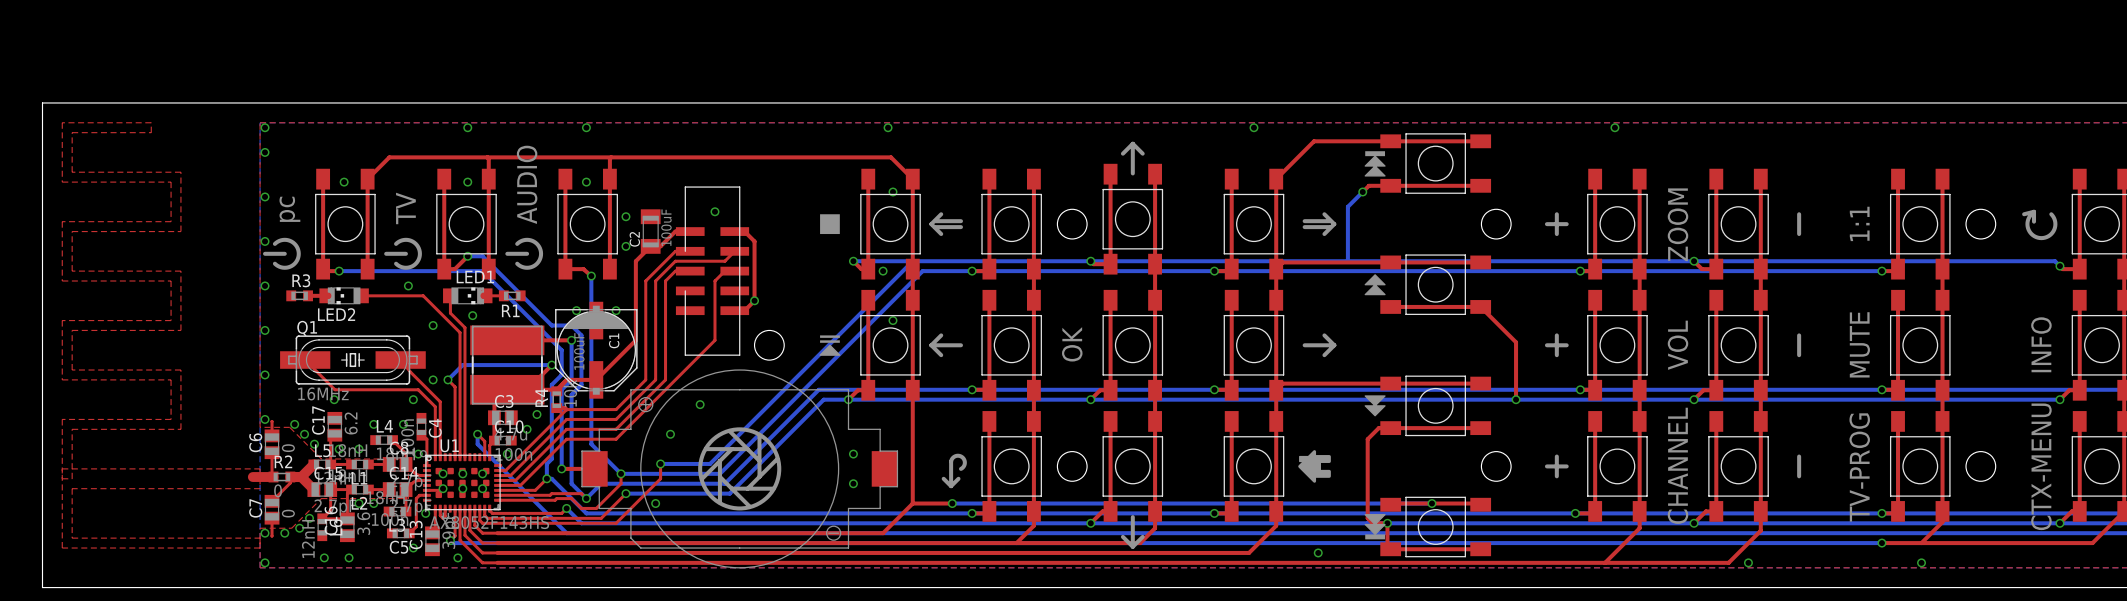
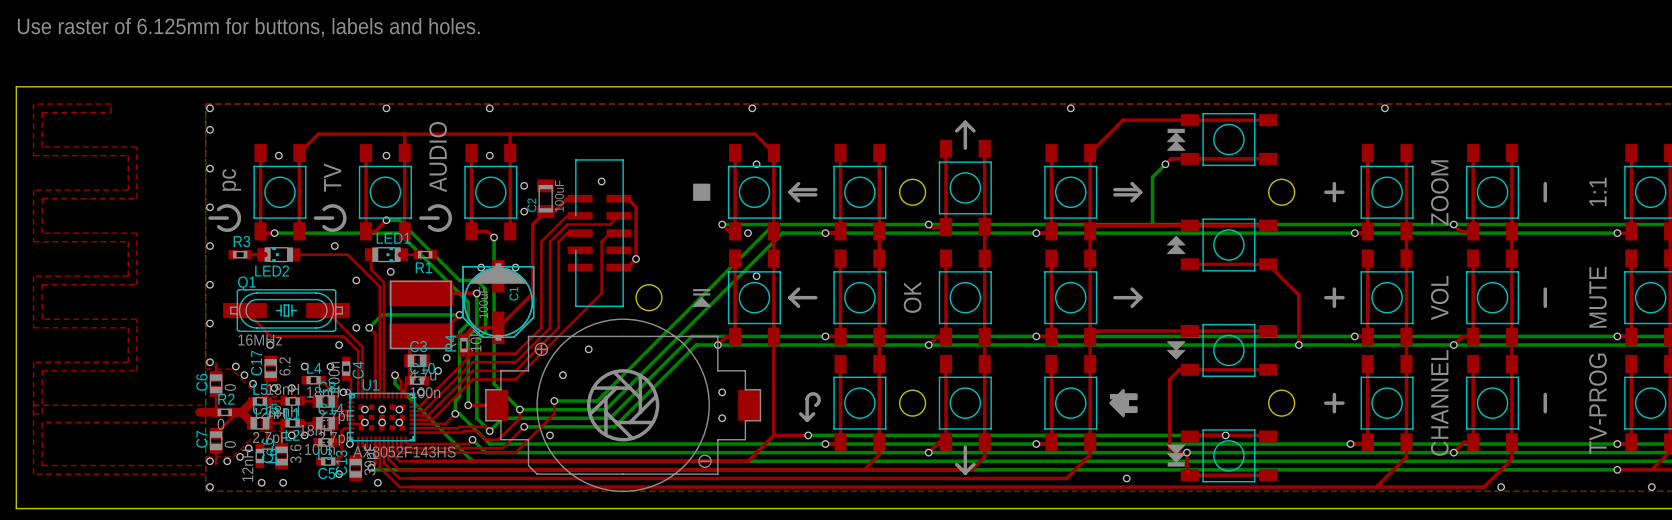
text: none -> Use raster of 6.125mm for buttons, labels and holes. (248, 27)

